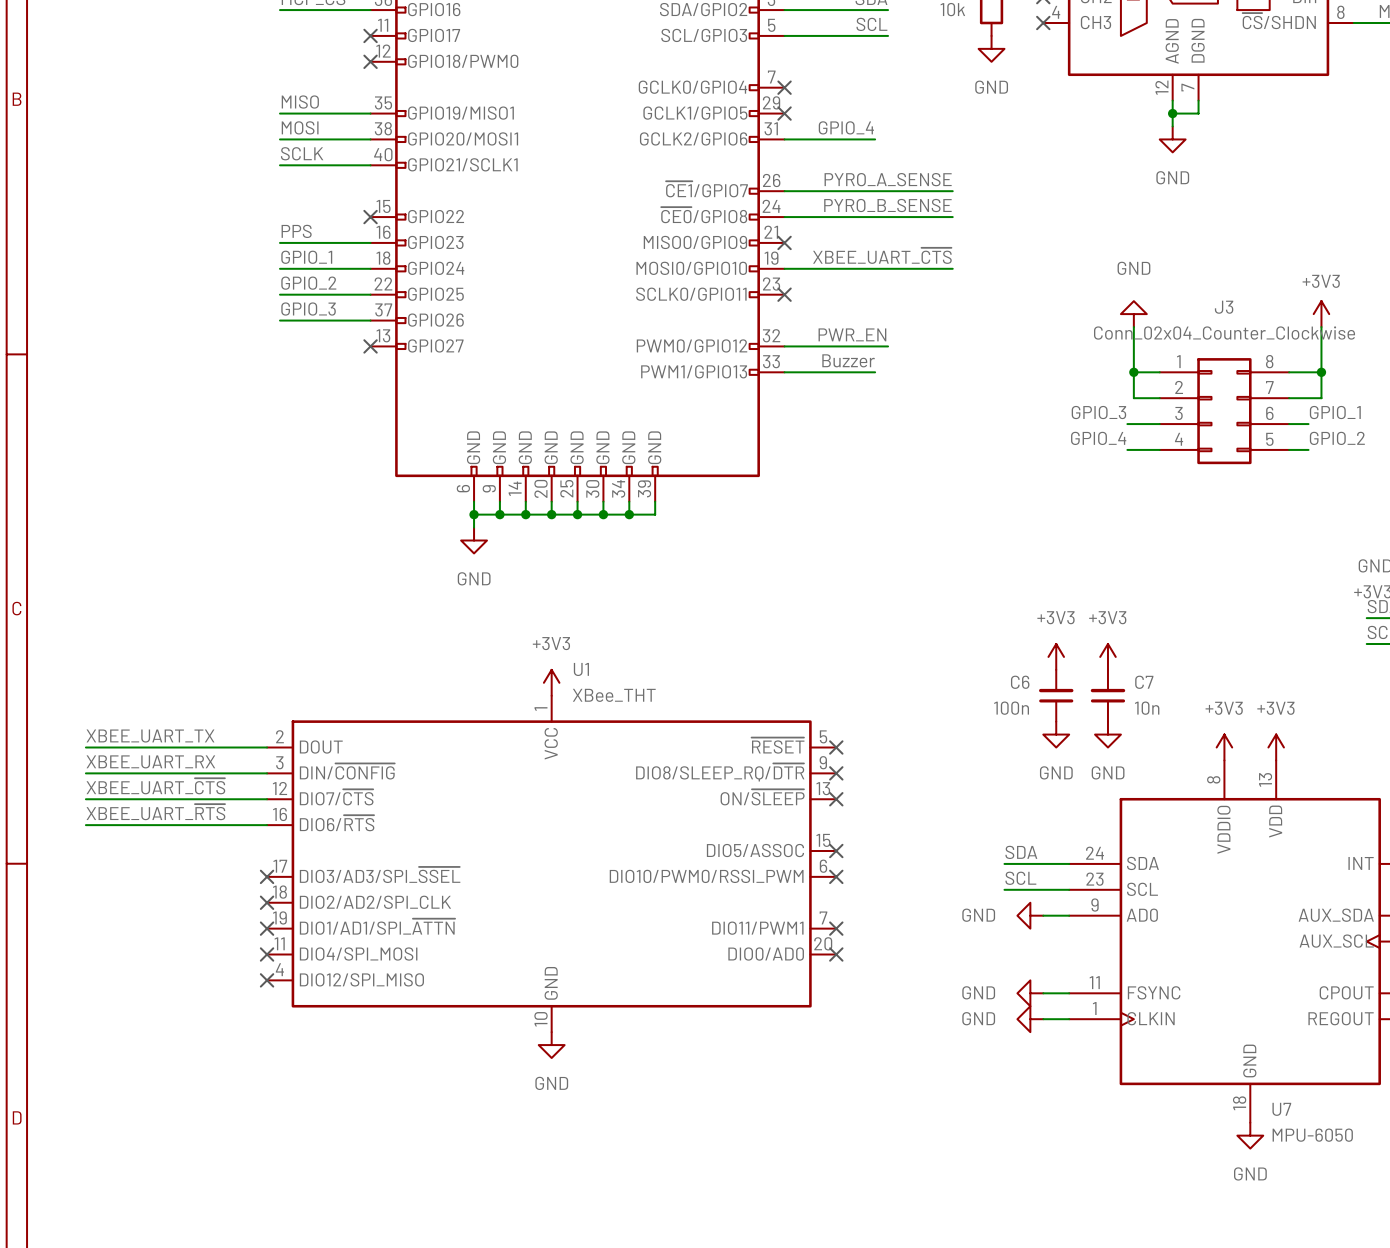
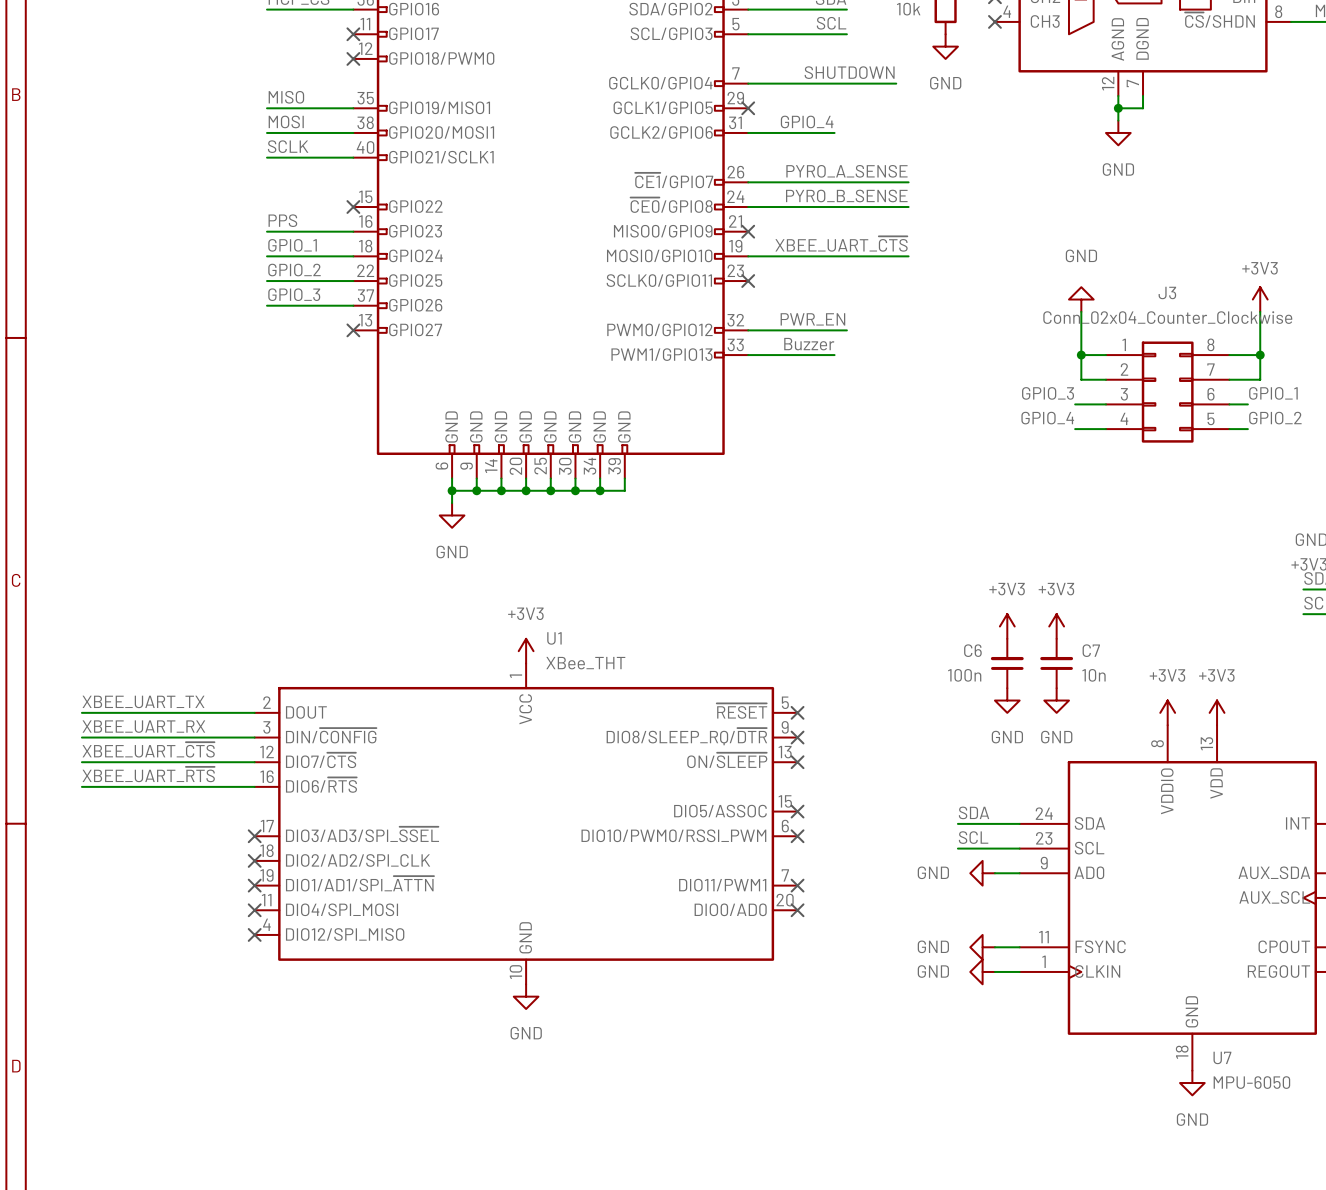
label: none -> SHUTDOWN (849, 72)
wire: none -> (748, 83) (896, 83)
no-connect mark: (784, 87) -> none

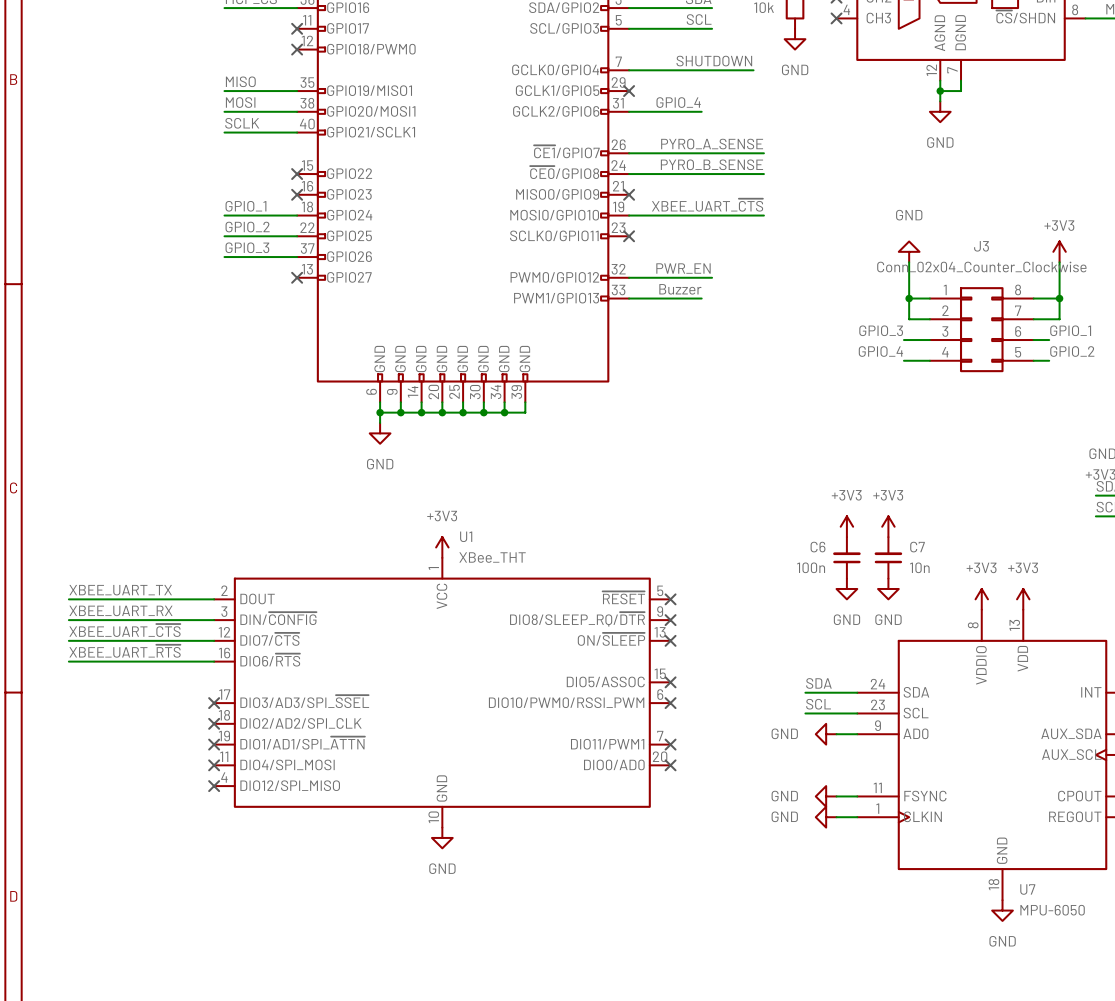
label: PPS (282, 220) -> none
wire: (267, 231) (353, 231) -> none
no-connect mark: none -> (297, 194)

